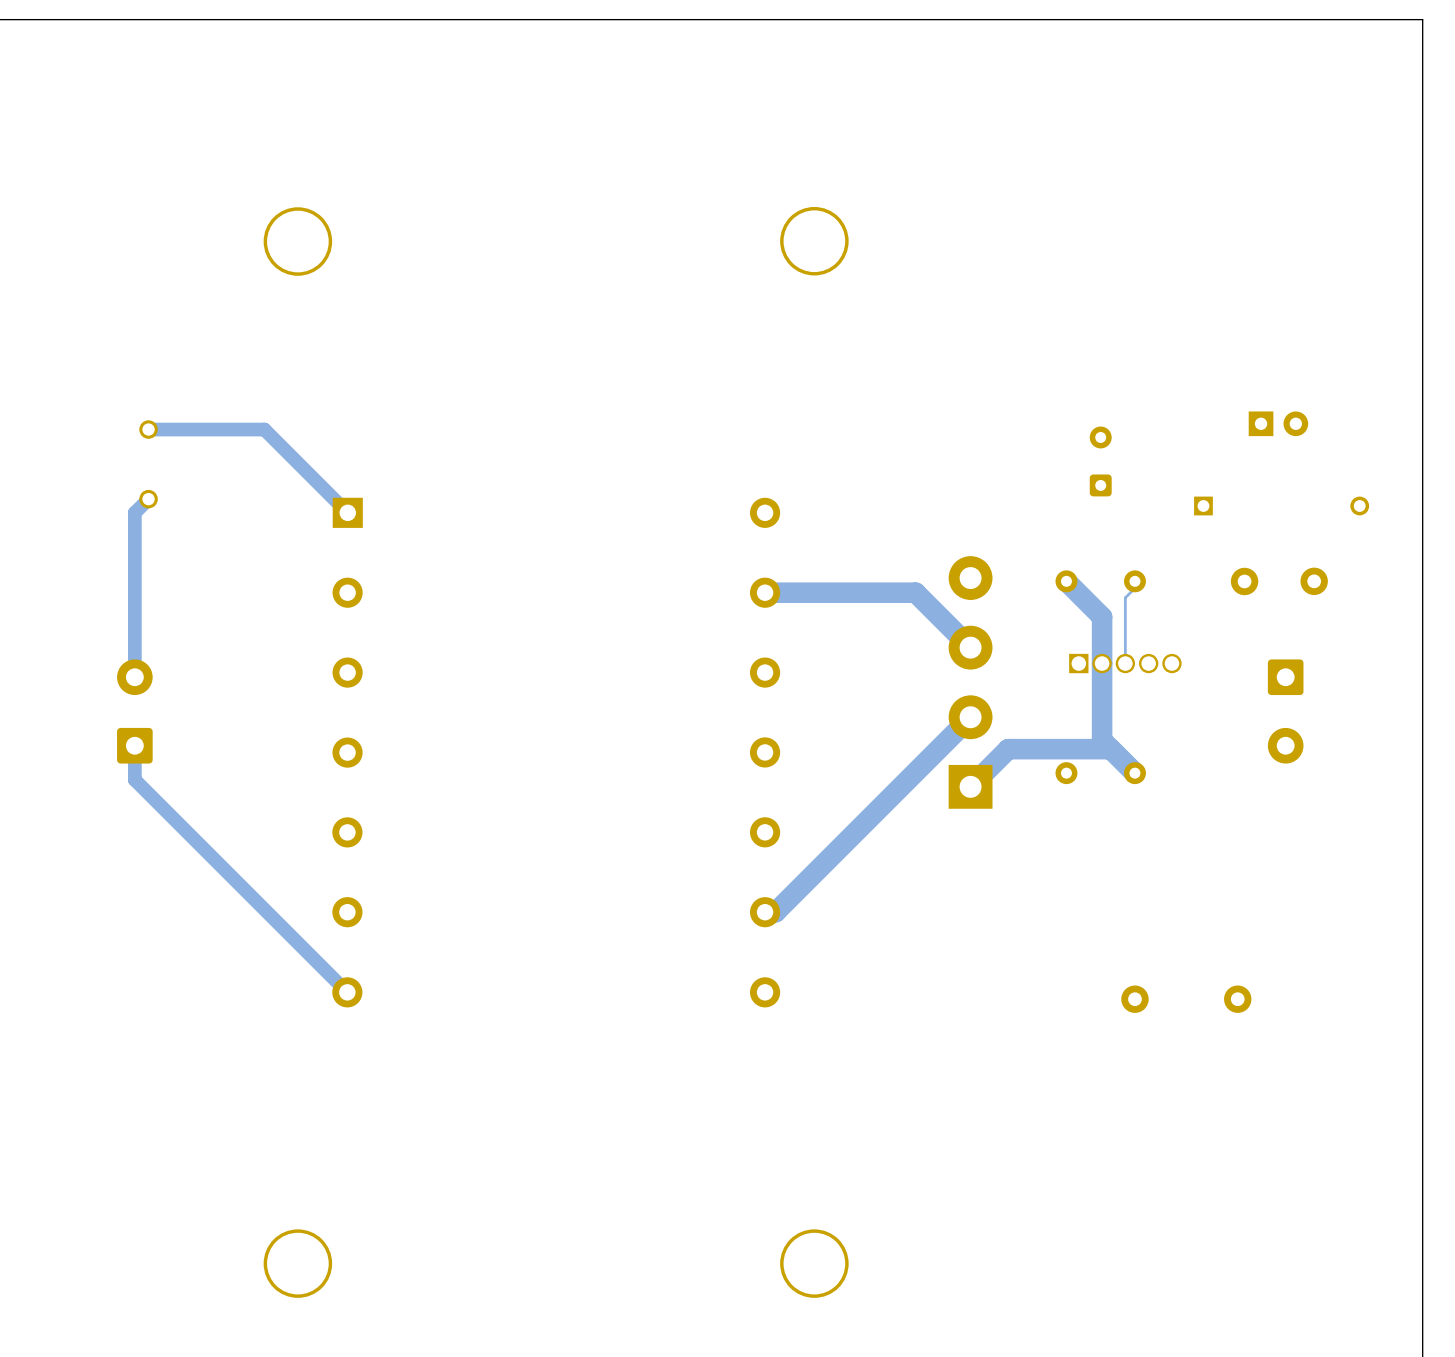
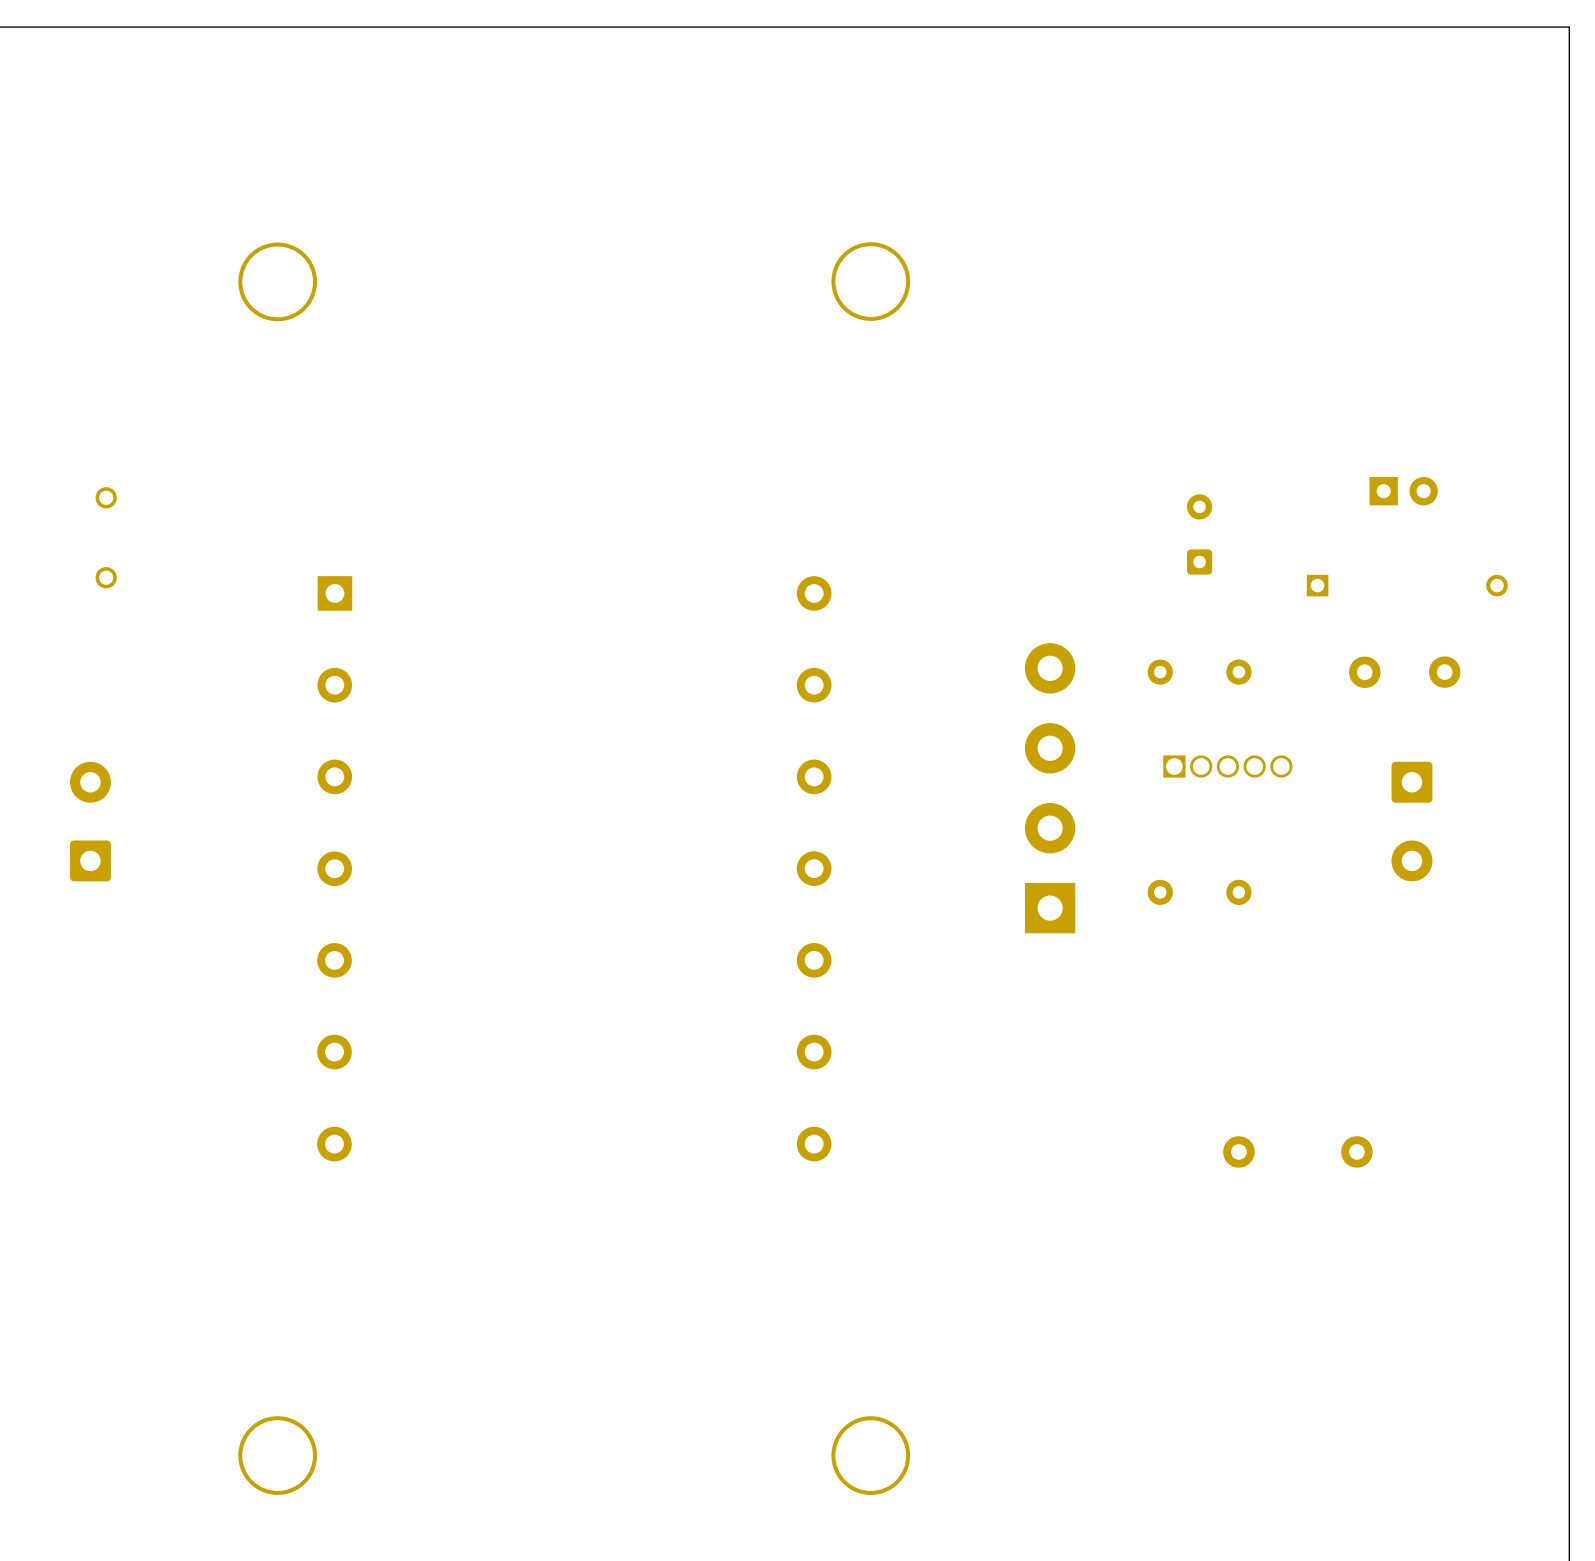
track: (148, 429) (264, 429) (347, 512) -> none
track: (148, 499) (134, 512) (134, 677) -> none
track: (1066, 581) (1102, 616) (1102, 740) (1134, 773) -> none
track: (1134, 588) (1125, 597) (1125, 663) -> none
track: (765, 592) (915, 592) (970, 647) -> none
track: (970, 717) (775, 912) (765, 912) -> none
track: (134, 745) (134, 779) (347, 992) -> none
track: (1110, 749) (1008, 749) (970, 786) -> none

